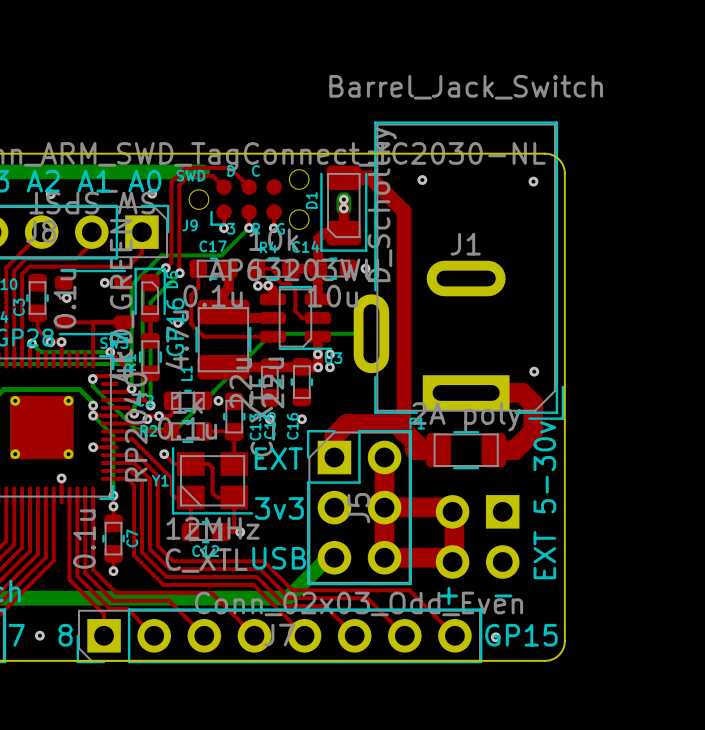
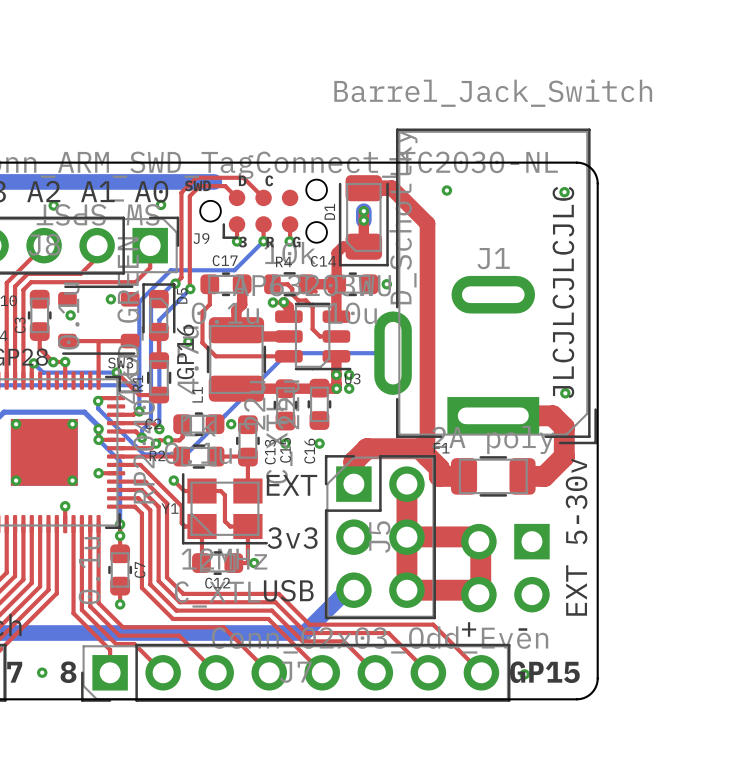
text: none -> JLCJLCJLCJLC (563, 292)

